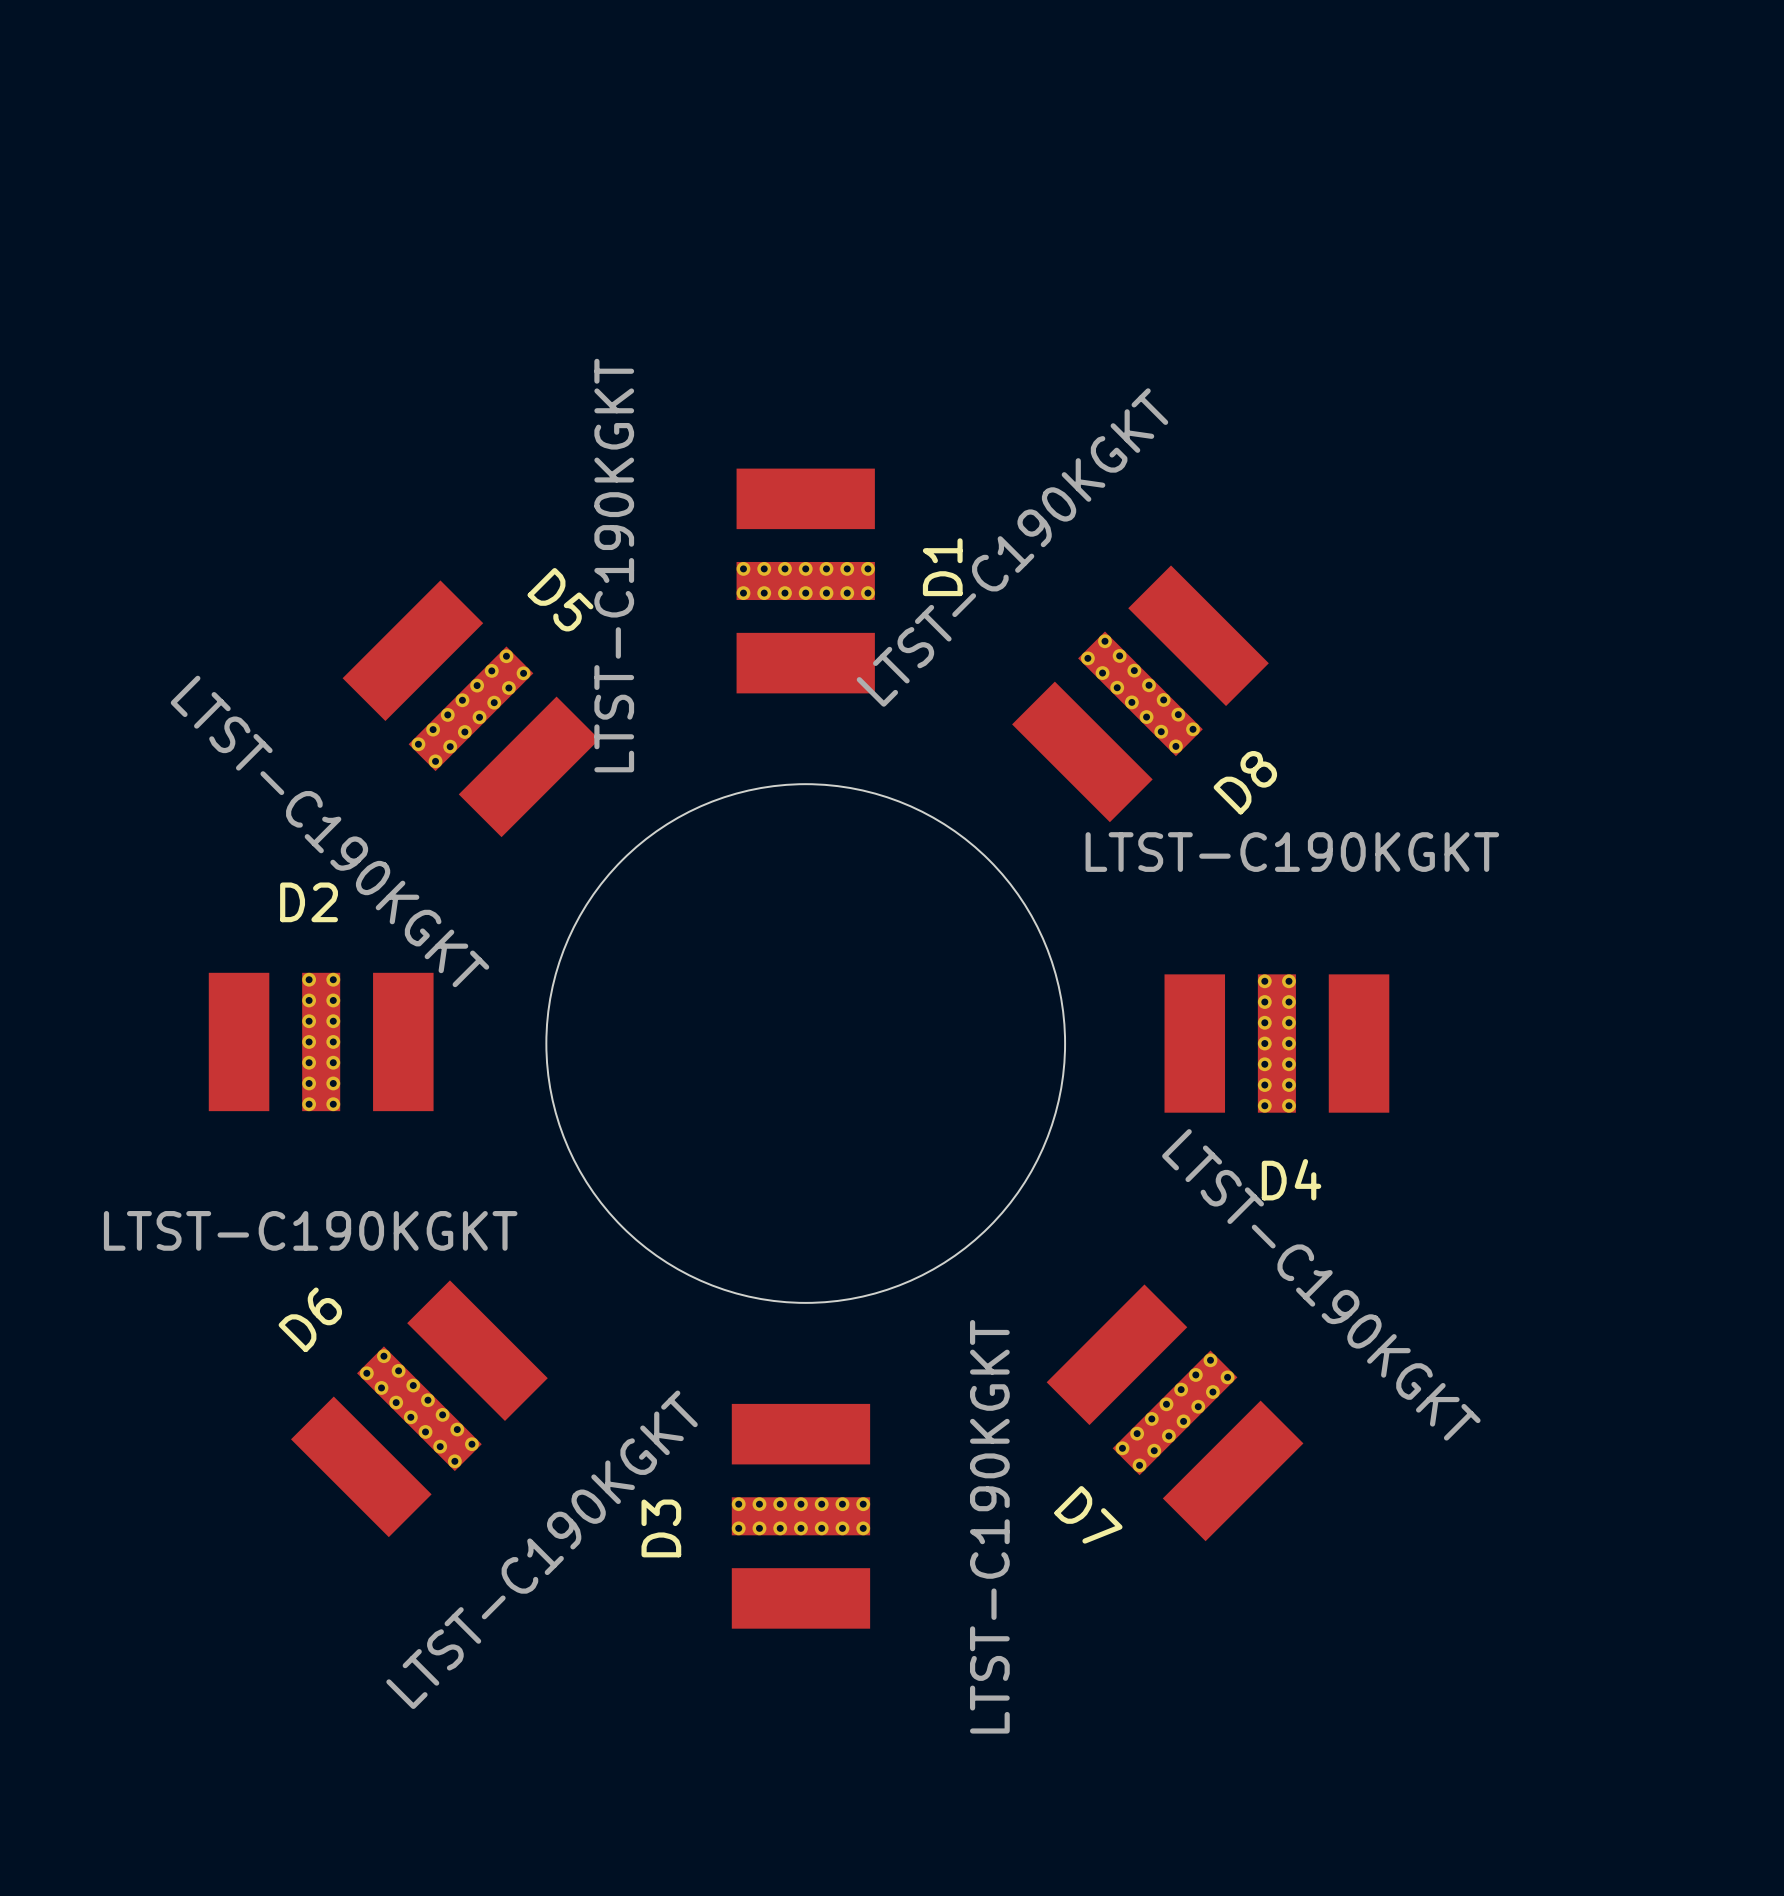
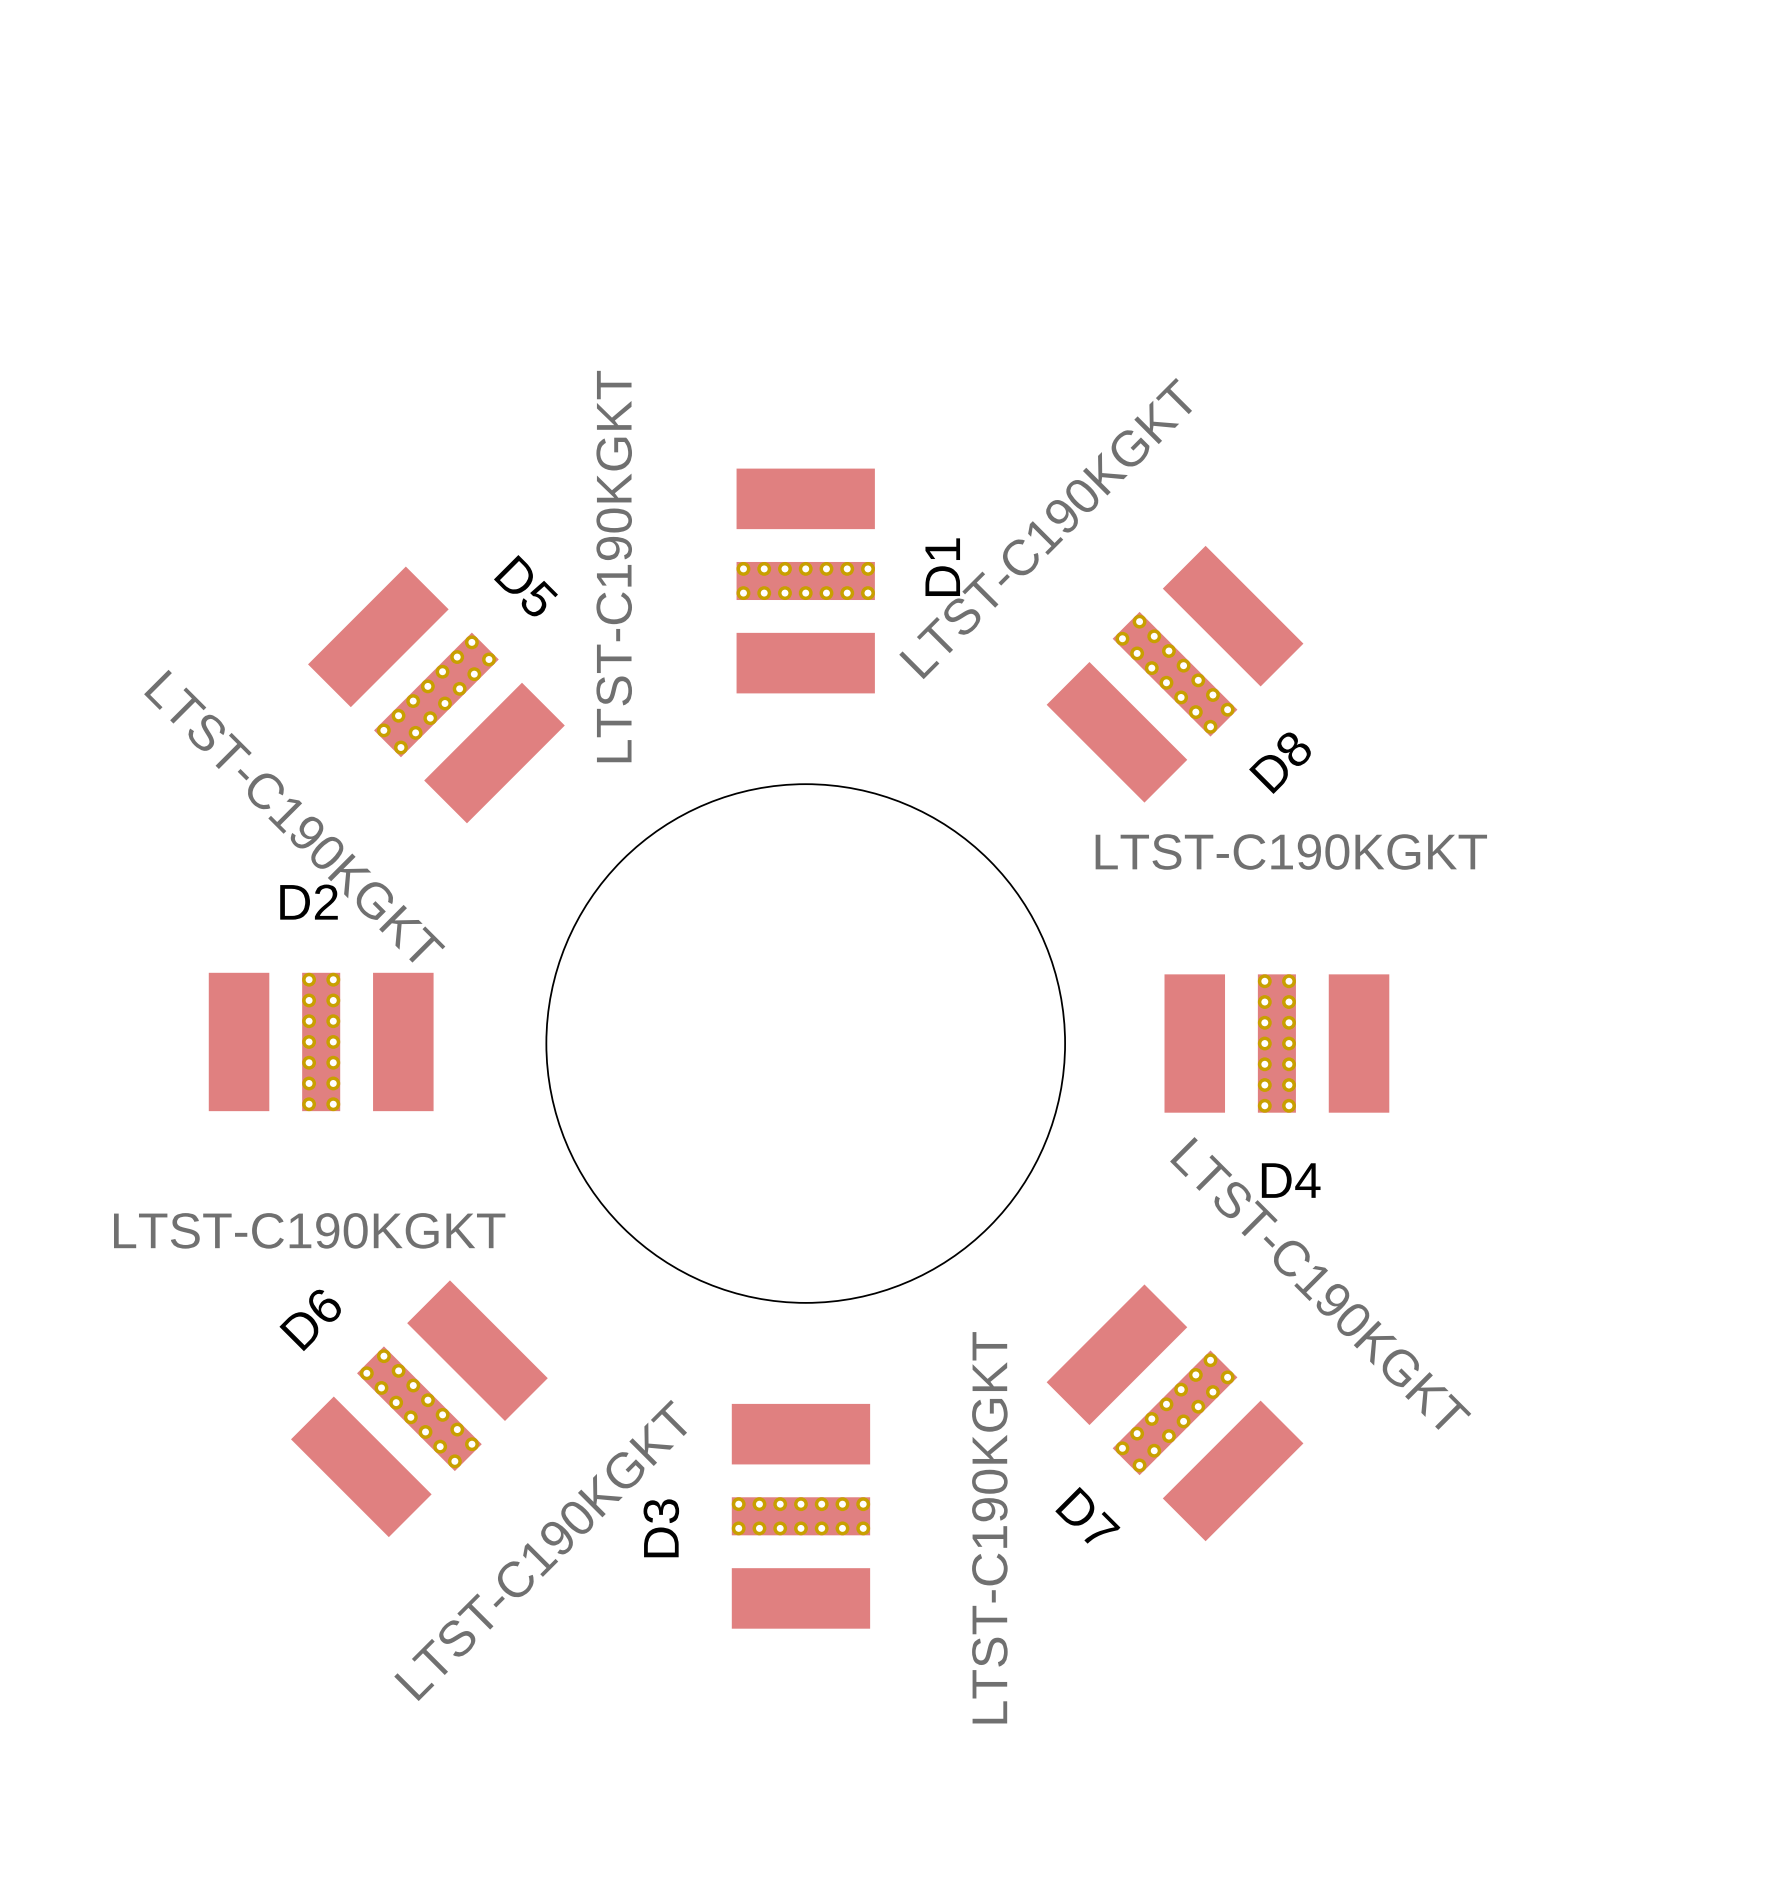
D8 position: (1140, 693) -> (1175, 674)
D5 position: (470, 708) -> (436, 694)

